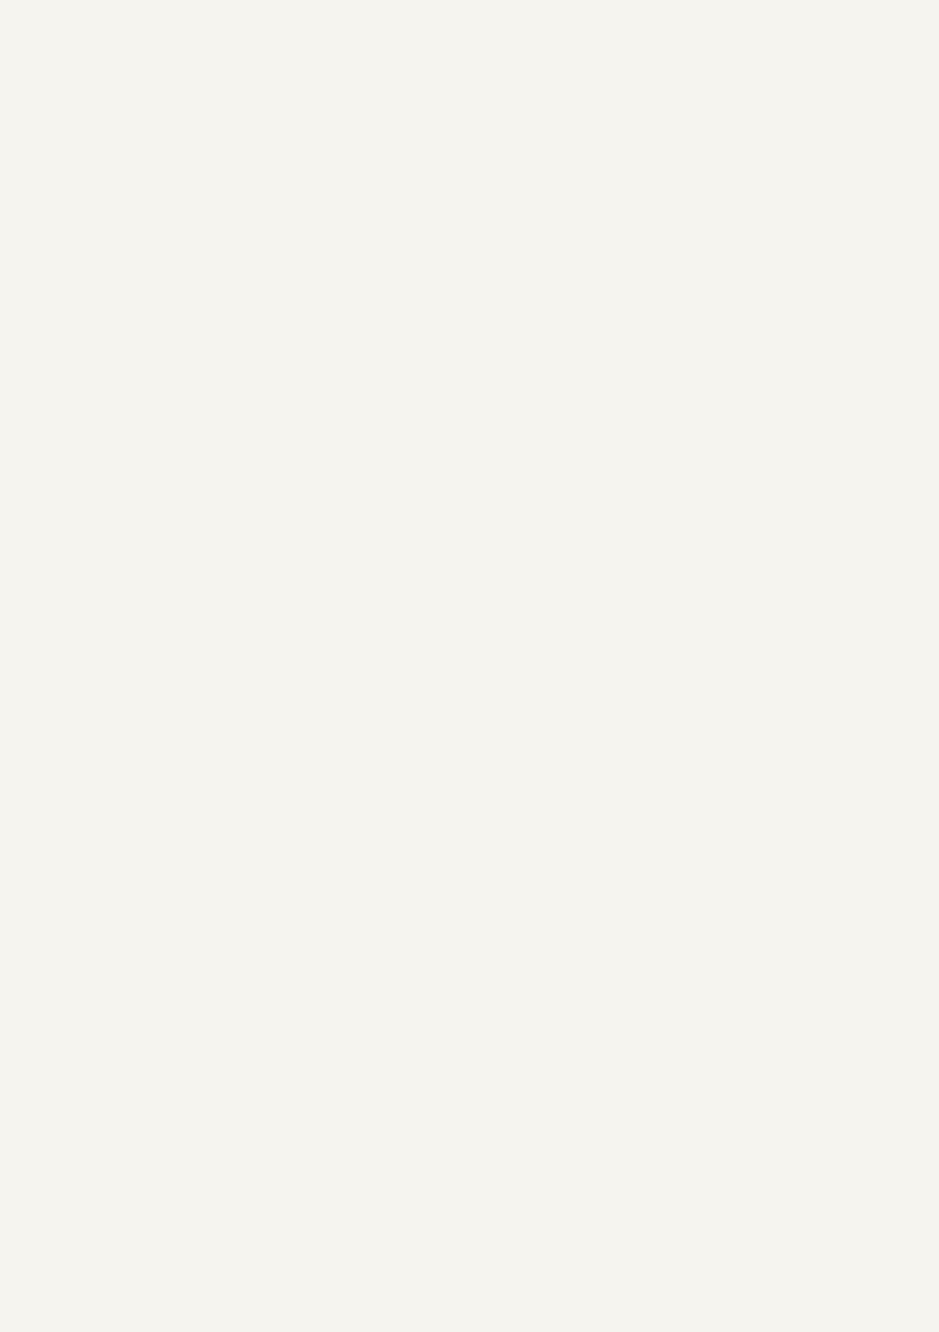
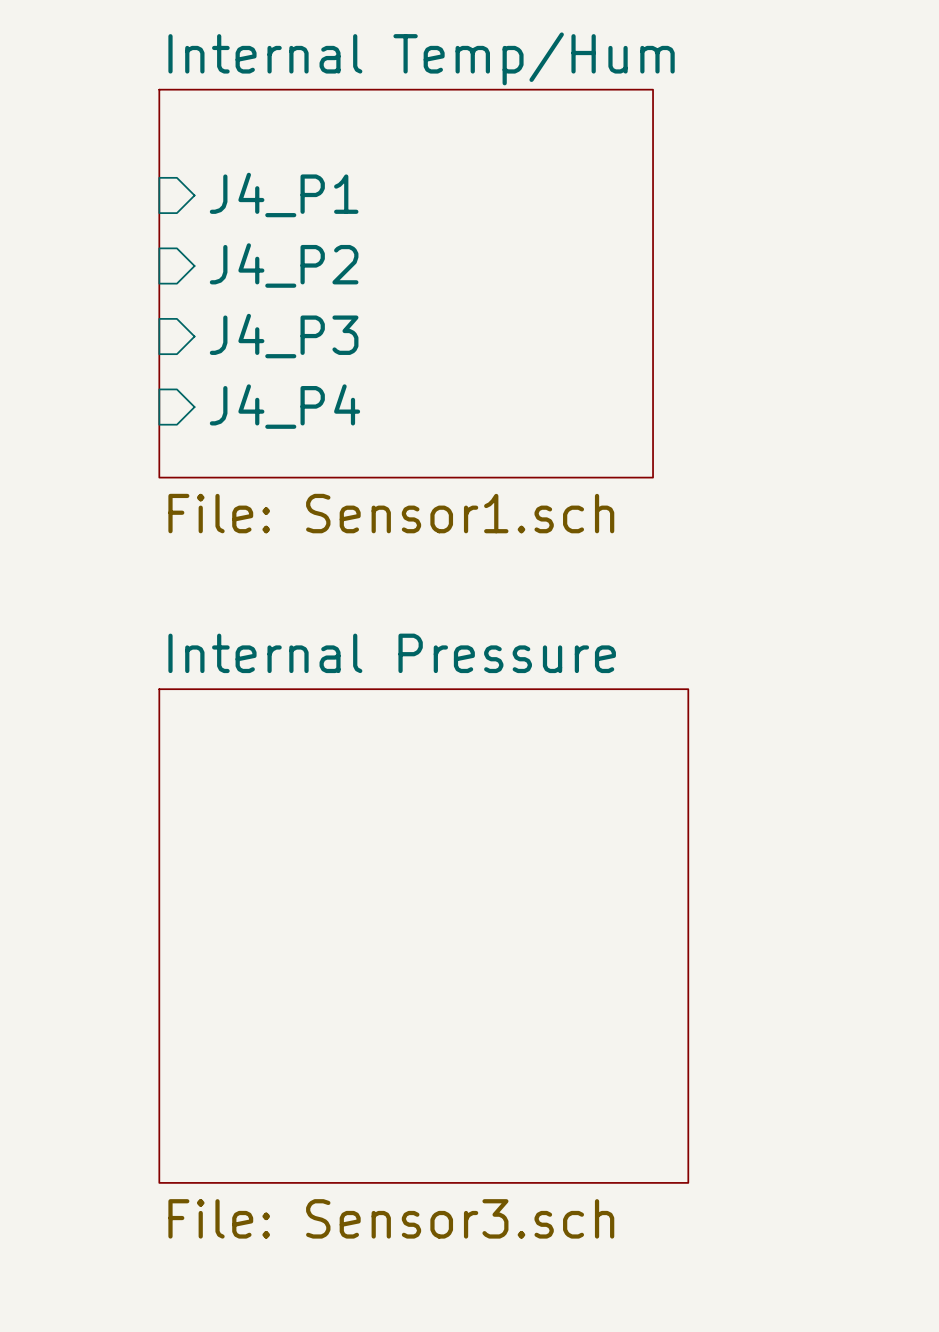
sheet pin: none -> J4_P1 (284, 194)
sheet pin: none -> J4_P2 (284, 265)
sheet Internal Temp/Hum: none -> File: Sensor1.sch (406, 283)
sheet pin: none -> J4_P3 (284, 336)
sheet pin: none -> J4_P4 (284, 406)
sheet Internal Pressure: none -> File: Sensor3.sch (423, 936)

